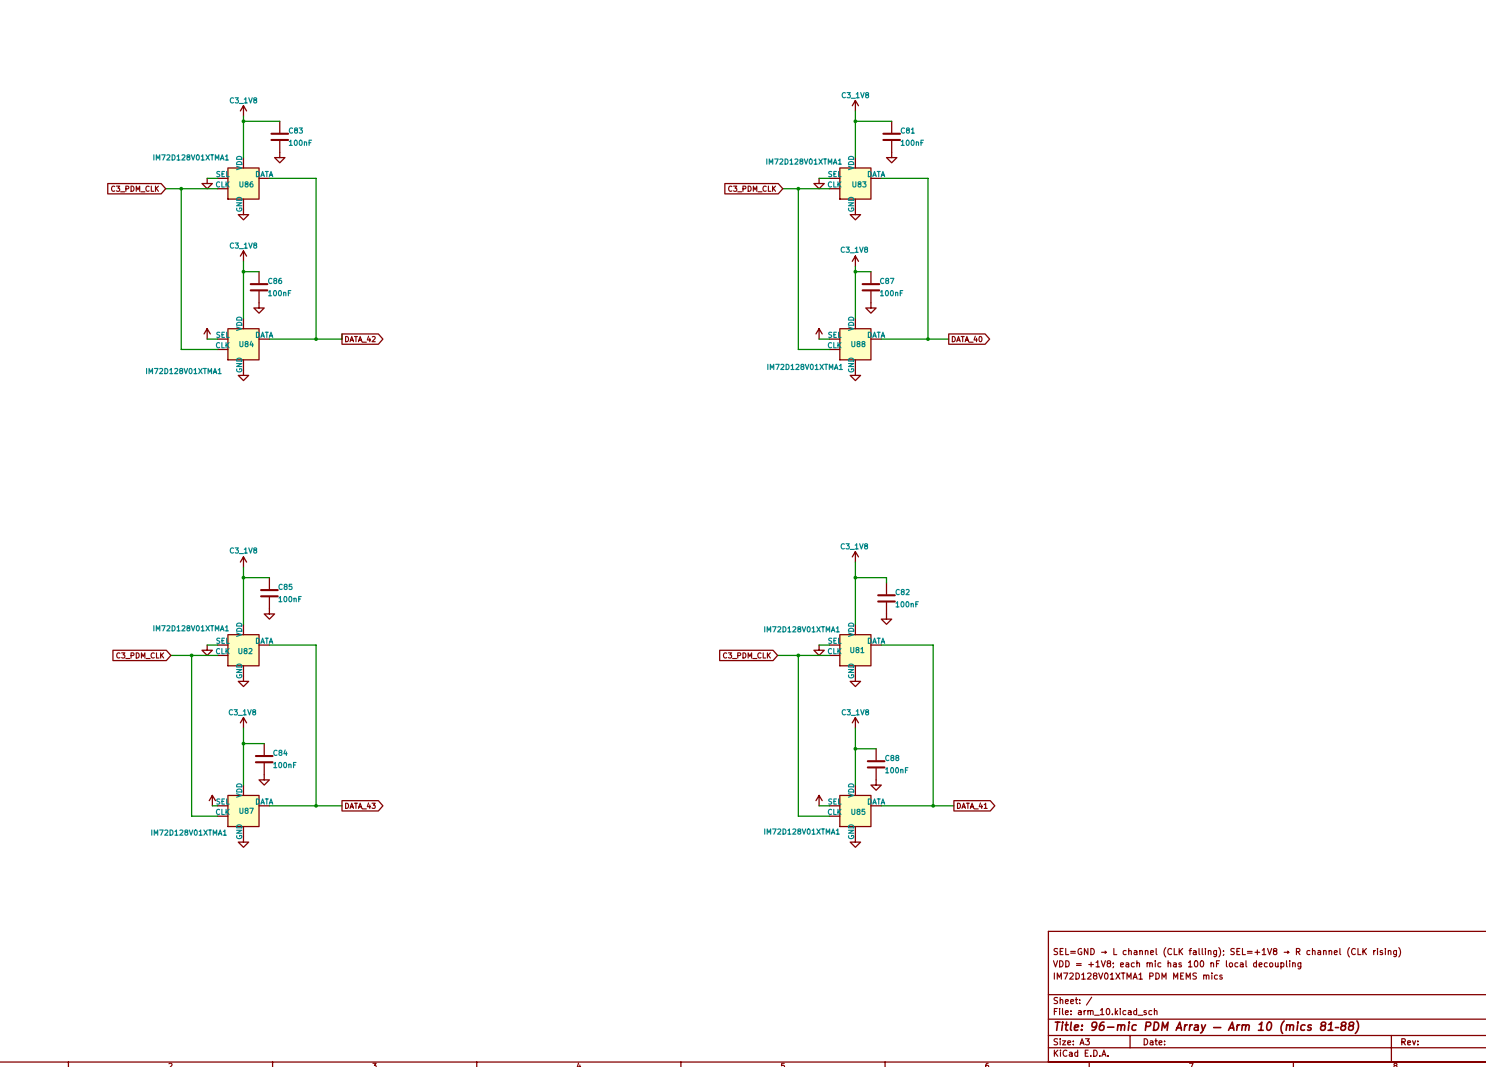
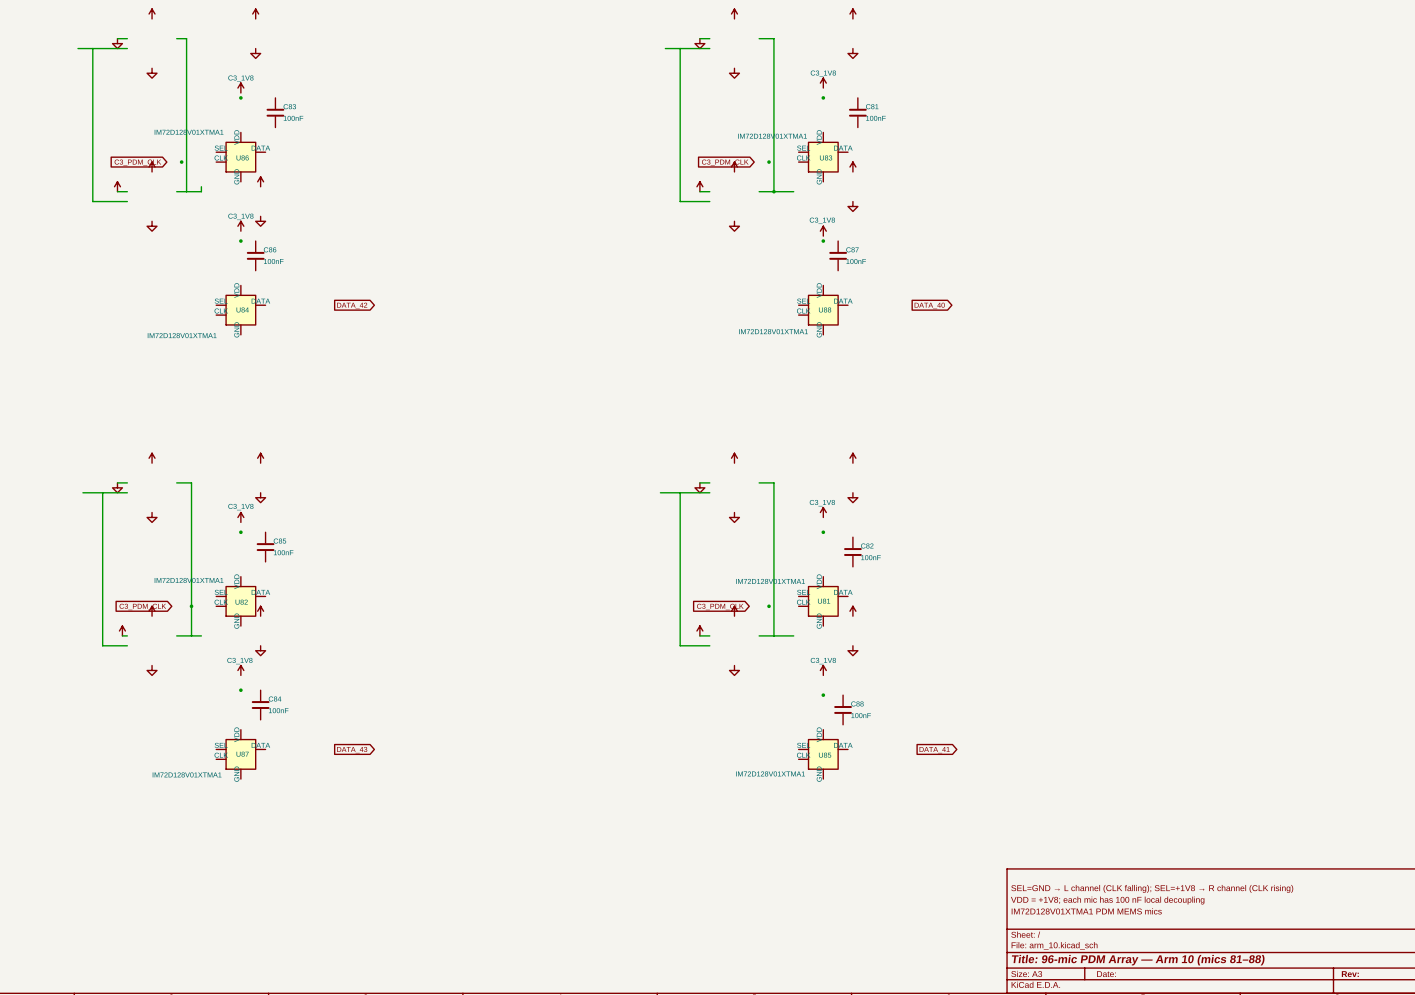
power symbol: none -> (152, 14)
power symbol: none -> (255, 14)
power symbol: none -> (734, 14)
power symbol: none -> (852, 14)
wire: none -> (117, 38) (127, 38)
wire: none -> (176, 38) (186, 38) (186, 191)
wire: none -> (699, 38) (709, 38)
wire: none -> (759, 38) (773, 38) (773, 191)
power symbol: none -> (117, 43)
power symbol: none -> (699, 43)
wire: none -> (77, 48) (127, 48)
wire: none -> (92, 48) (92, 201) (127, 201)
wire: none -> (665, 48) (709, 48)
wire: none -> (680, 48) (680, 201) (709, 201)
power symbol: none -> (255, 53)
power symbol: none -> (852, 53)
power symbol: none -> (152, 73)
power symbol: none -> (734, 73)
wire: (855, 110) (855, 157) -> none
wire: (243, 116) (243, 157) -> none
wire: (243, 121) (279, 121) -> none
wire: (855, 121) (891, 121) -> none
power symbol: (279, 157) -> none
power symbol: (891, 157) -> none
wire: (207, 178) (217, 178) -> none
wire: (269, 178) (316, 178) (316, 339) -> none
wire: (819, 178) (829, 178) -> none
wire: (881, 178) (927, 178) (927, 339) -> none
power symbol: (207, 183) -> none
power symbol: (819, 183) -> none
wire: (165, 188) (217, 188) -> none
wire: (181, 188) (181, 349) (217, 349) -> none
wire: (782, 188) (829, 188) -> none
wire: (798, 188) (798, 349) (829, 349) -> none
power symbol: none -> (152, 167)
power symbol: none -> (734, 167)
power symbol: none -> (852, 167)
power symbol: none -> (260, 181)
power symbol: none -> (117, 186)
wire: none -> (201, 186) (201, 191) (176, 191)
power symbol: (243, 214) -> none
power symbol: none -> (699, 186)
power symbol: (855, 214) -> none
wire: none -> (117, 191) (127, 191)
wire: none -> (699, 191) (709, 191)
wire: none -> (759, 191) (793, 191)
junction: none -> (773, 191)
power symbol: none -> (852, 206)
power symbol: none -> (260, 221)
power symbol: none -> (152, 226)
power symbol: none -> (734, 226)
wire: (243, 261) (243, 318) -> none
wire: (855, 266) (855, 318) -> none
wire: (243, 271) (259, 271) -> none
wire: (855, 271) (870, 271) -> none
power symbol: (259, 307) -> none
power symbol: (870, 307) -> none
power symbol: (207, 333) -> none
wire: (342, 333) (342, 339) (269, 339) -> none
power symbol: (819, 333) -> none
wire: (207, 339) (217, 339) -> none
junction: (316, 339) -> none
wire: (819, 339) (829, 339) -> none
wire: (881, 339) (948, 339) -> none
junction: (927, 339) -> none
power symbol: (243, 375) -> none
power symbol: (855, 375) -> none
power symbol: none -> (152, 458)
power symbol: none -> (260, 458)
power symbol: none -> (734, 458)
power symbol: none -> (852, 458)
wire: none -> (117, 482) (127, 482)
wire: none -> (176, 482) (191, 482) (191, 606)
wire: none -> (699, 482) (709, 482)
wire: none -> (759, 482) (773, 482) (773, 635)
power symbol: none -> (117, 487)
power symbol: none -> (699, 487)
wire: none -> (82, 492) (127, 492)
wire: none -> (102, 492) (102, 645) (127, 645)
wire: none -> (660, 492) (709, 492)
wire: none -> (680, 492) (680, 645) (709, 645)
power symbol: none -> (260, 497)
power symbol: none -> (852, 497)
power symbol: none -> (152, 517)
power symbol: none -> (734, 517)
wire: (855, 562) (855, 624) -> none
wire: (243, 567) (243, 624) -> none
wire: (243, 577) (269, 577) -> none
wire: (855, 577) (886, 577) (886, 582) -> none
power symbol: (269, 613) -> none
power symbol: (886, 619) -> none
wire: (207, 645) (217, 645) -> none
wire: (269, 645) (316, 645) (316, 805) -> none
wire: (819, 645) (829, 645) -> none
wire: (881, 645) (933, 645) (933, 805) -> none
power symbol: (207, 650) -> none
power symbol: (819, 650) -> none
wire: (170, 655) (217, 655) -> none
wire: (777, 655) (829, 655) -> none
wire: (798, 655) (798, 816) (829, 816) -> none
power symbol: none -> (152, 611)
power symbol: none -> (260, 611)
power symbol: none -> (734, 611)
power symbol: none -> (852, 611)
power symbol: none -> (122, 630)
power symbol position: (243, 681) -> (260, 650)
power symbol: none -> (699, 630)
power symbol position: (855, 681) -> (852, 650)
wire: none -> (122, 635) (127, 635)
wire: none -> (176, 635) (201, 635)
wire: (191, 686) (191, 816) (217, 816) -> none
wire: none -> (699, 635) (709, 635)
wire: none -> (759, 635) (793, 635)
power symbol: none -> (152, 670)
power symbol: none -> (734, 670)
wire: (243, 728) (243, 785) -> none
wire: (855, 728) (855, 785) -> none
wire: (243, 743) (264, 743) -> none
wire: (855, 748) (876, 748) -> none
power symbol: (264, 779) -> none
power symbol: (876, 785) -> none
power symbol: (212, 800) -> none
power symbol: (819, 800) -> none
wire: (212, 805) (217, 805) -> none
wire: (269, 805) (342, 805) -> none
junction: (316, 805) -> none
wire: (819, 805) (829, 805) -> none
wire: (881, 805) (953, 805) -> none
junction: (933, 805) -> none
power symbol: (243, 842) -> none
power symbol: (855, 842) -> none

